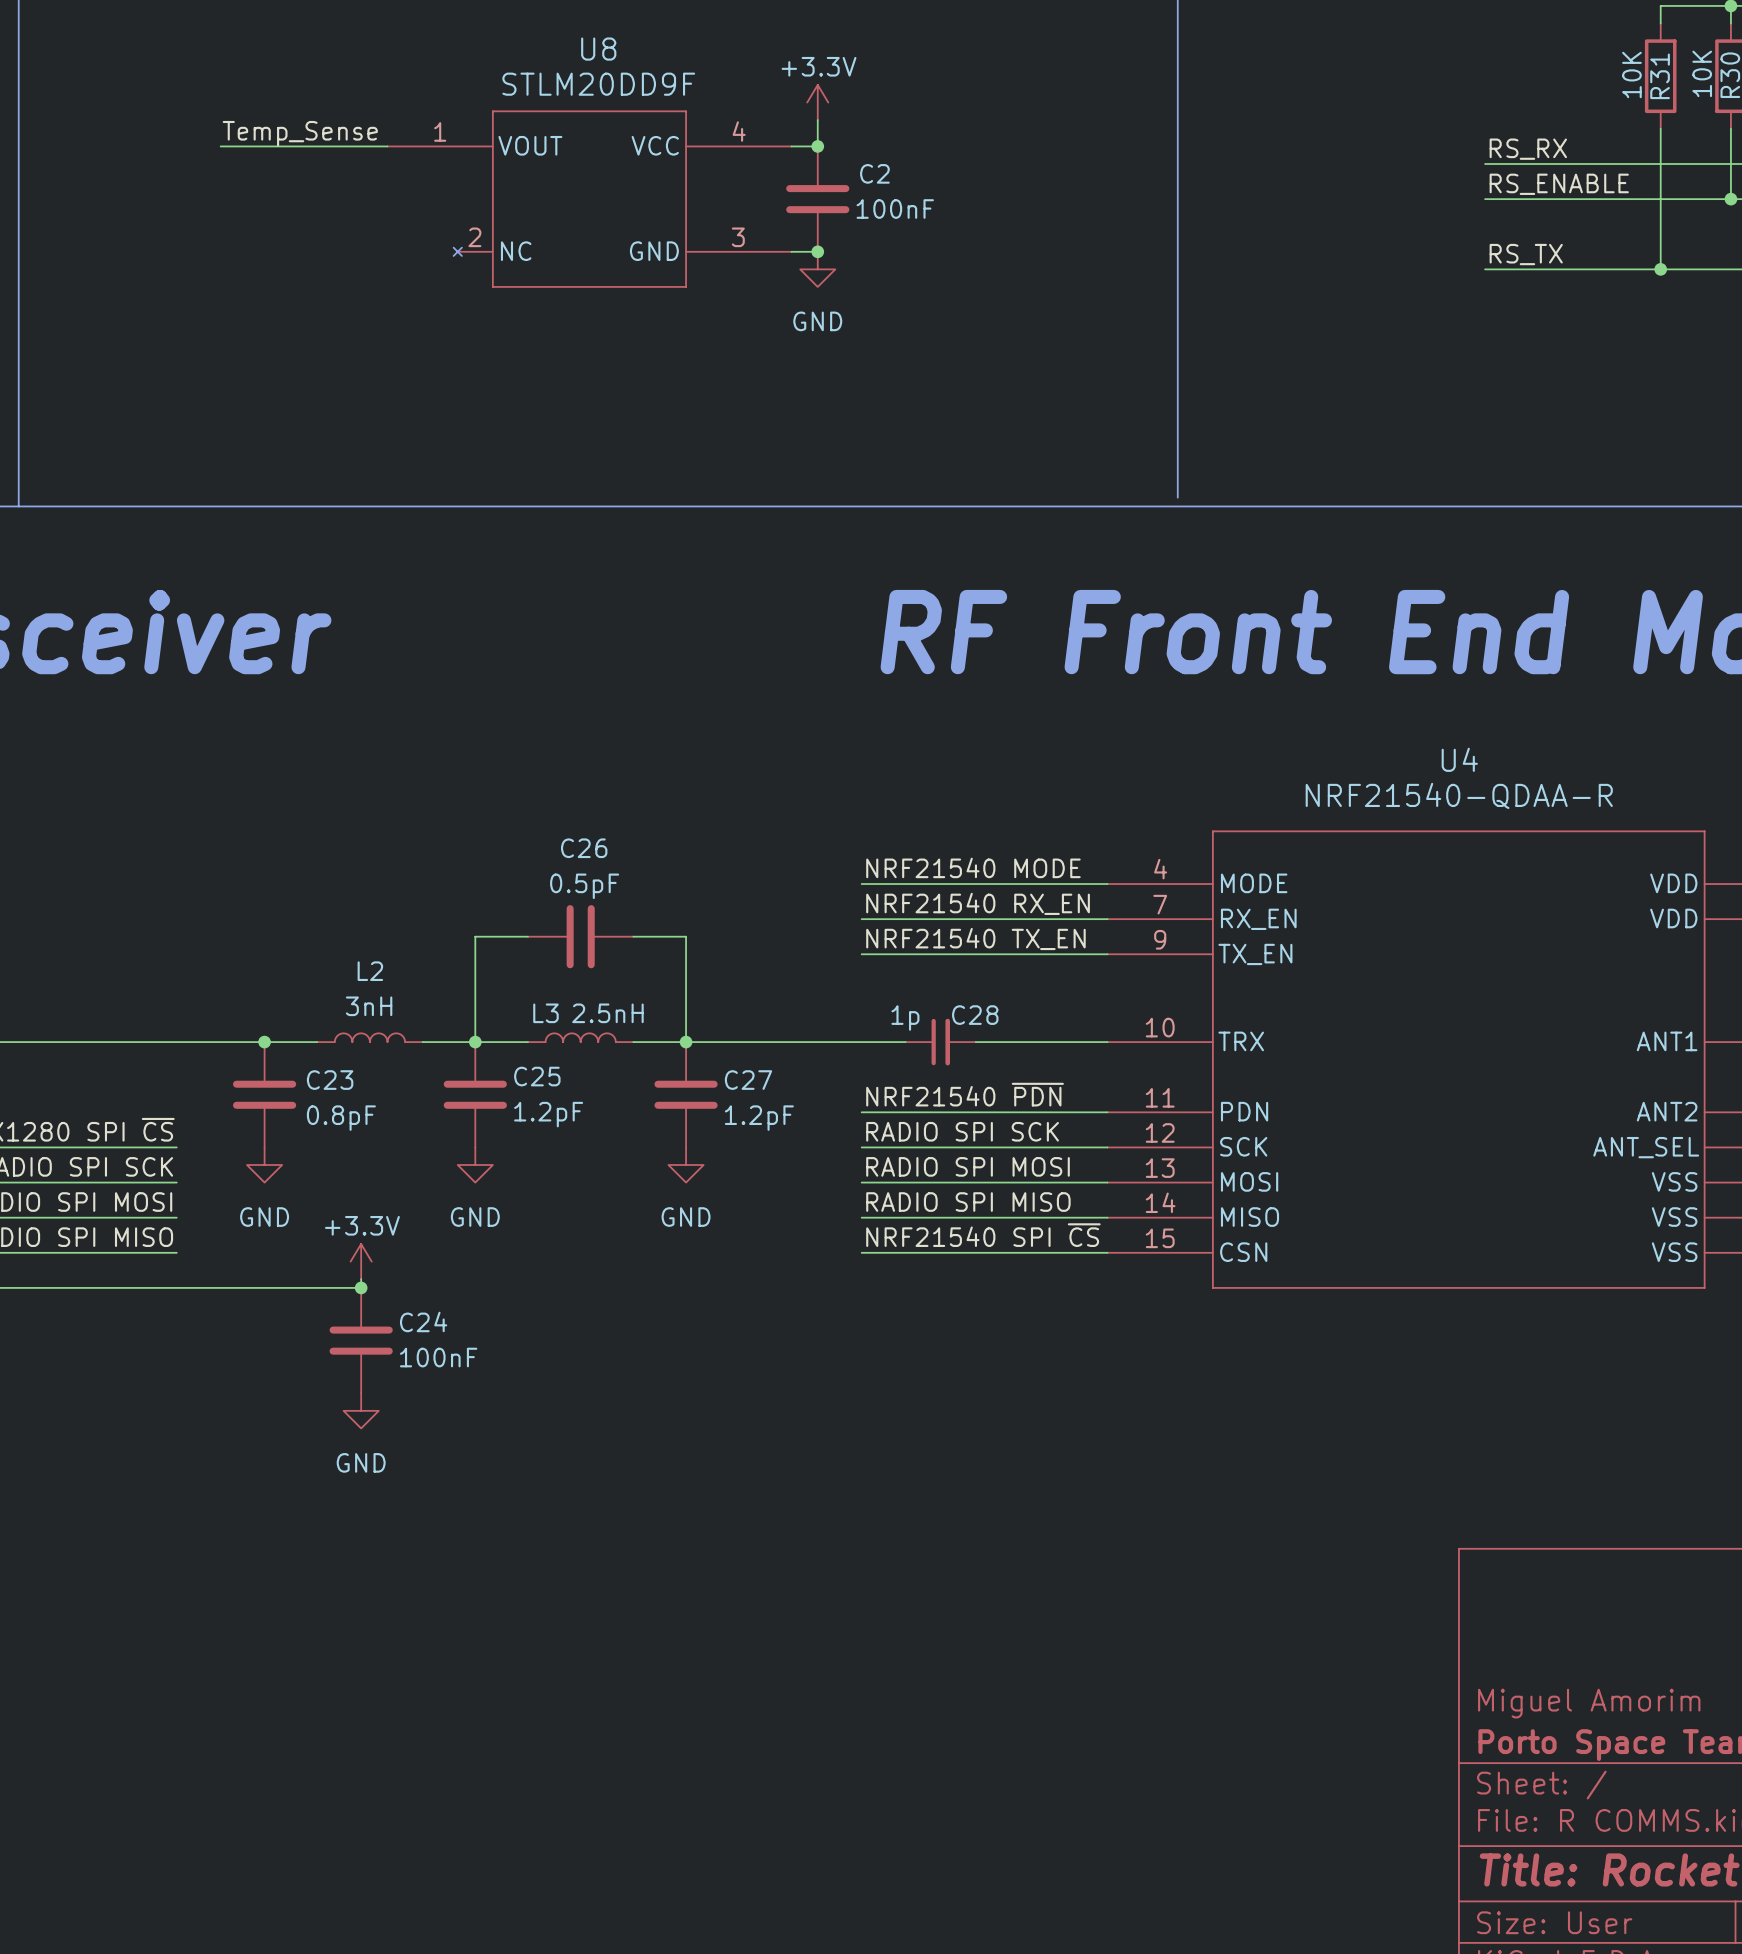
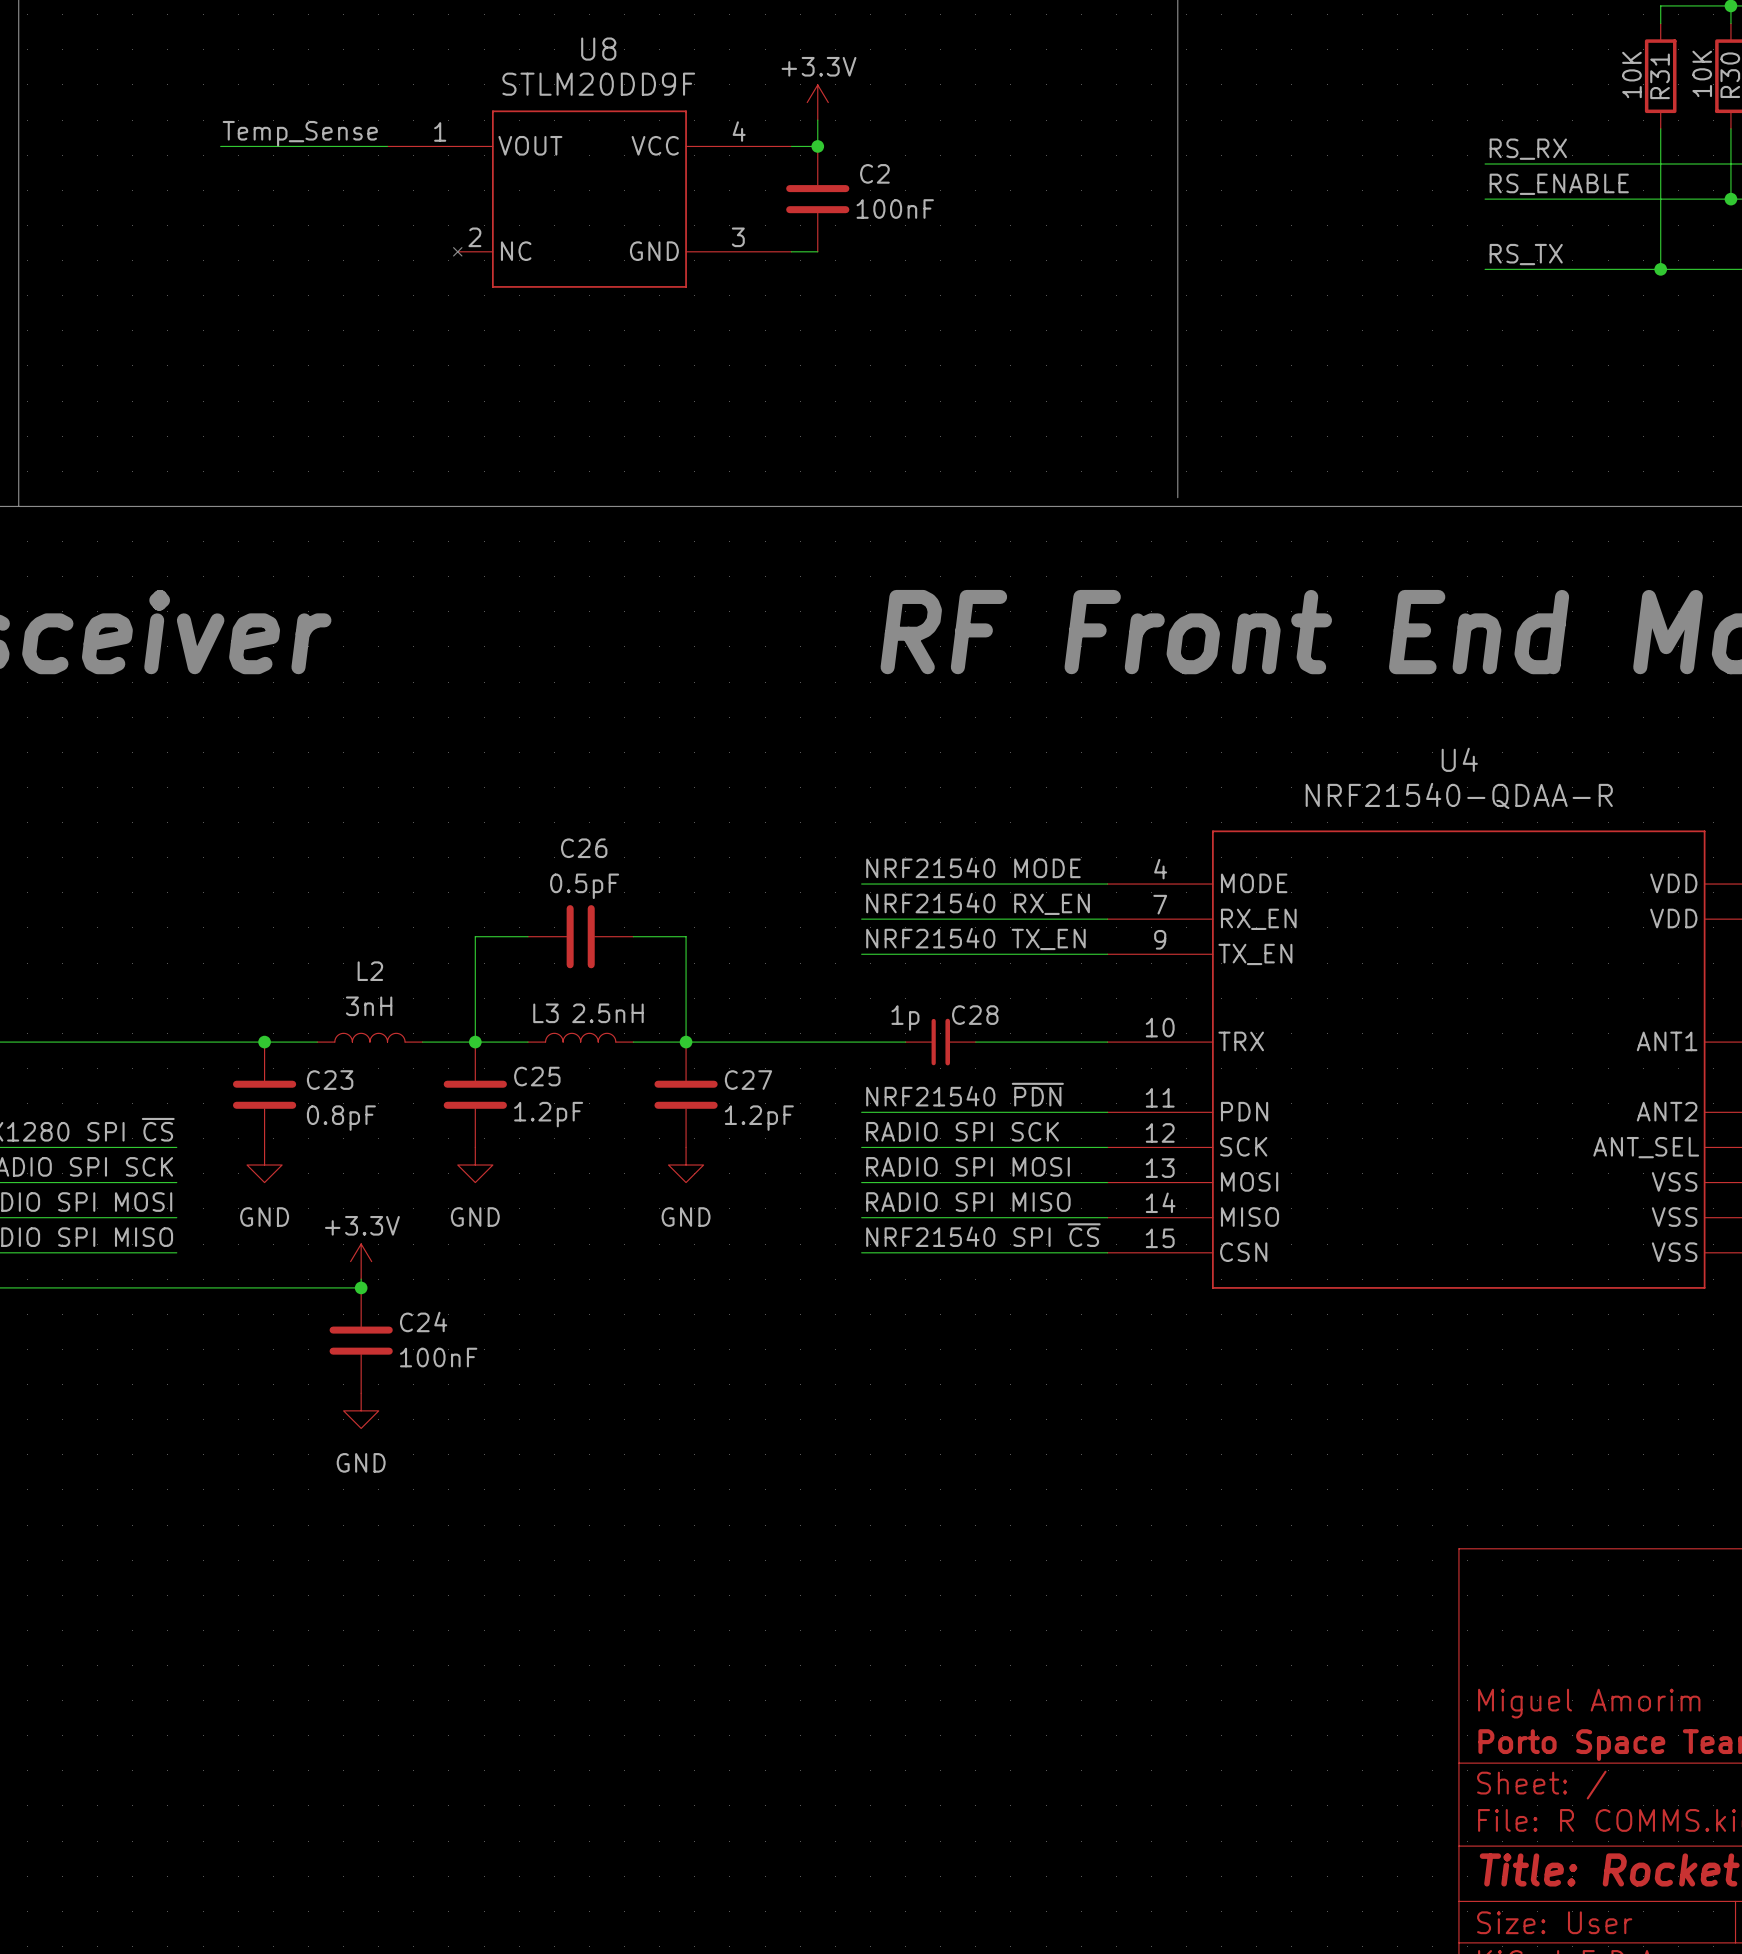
junction: (817, 251) -> none
power symbol: GND (817, 269) -> none

